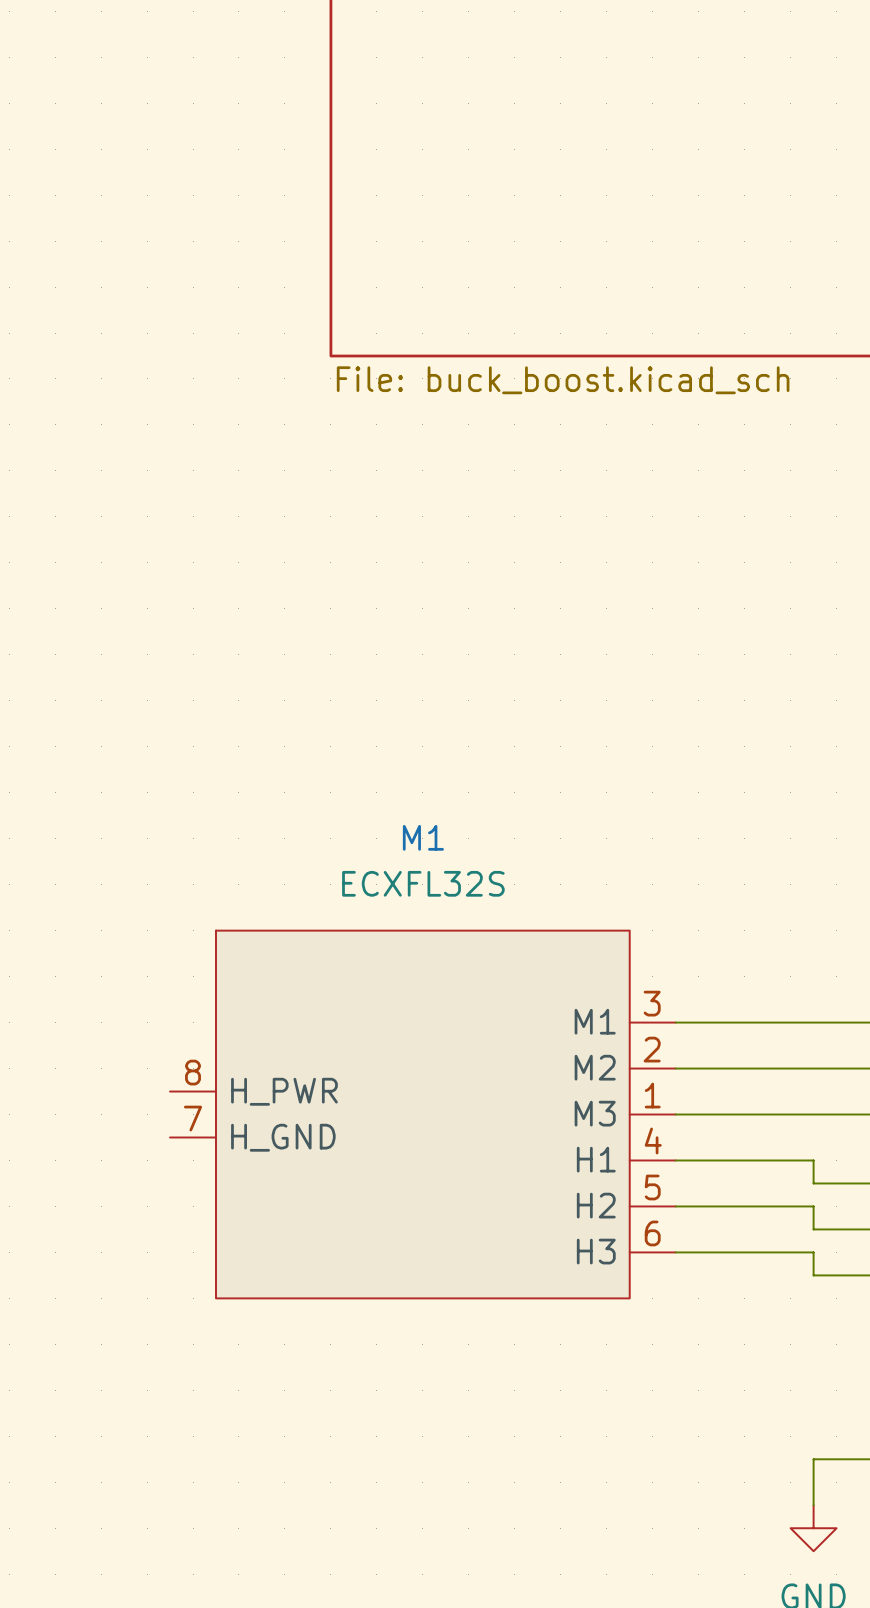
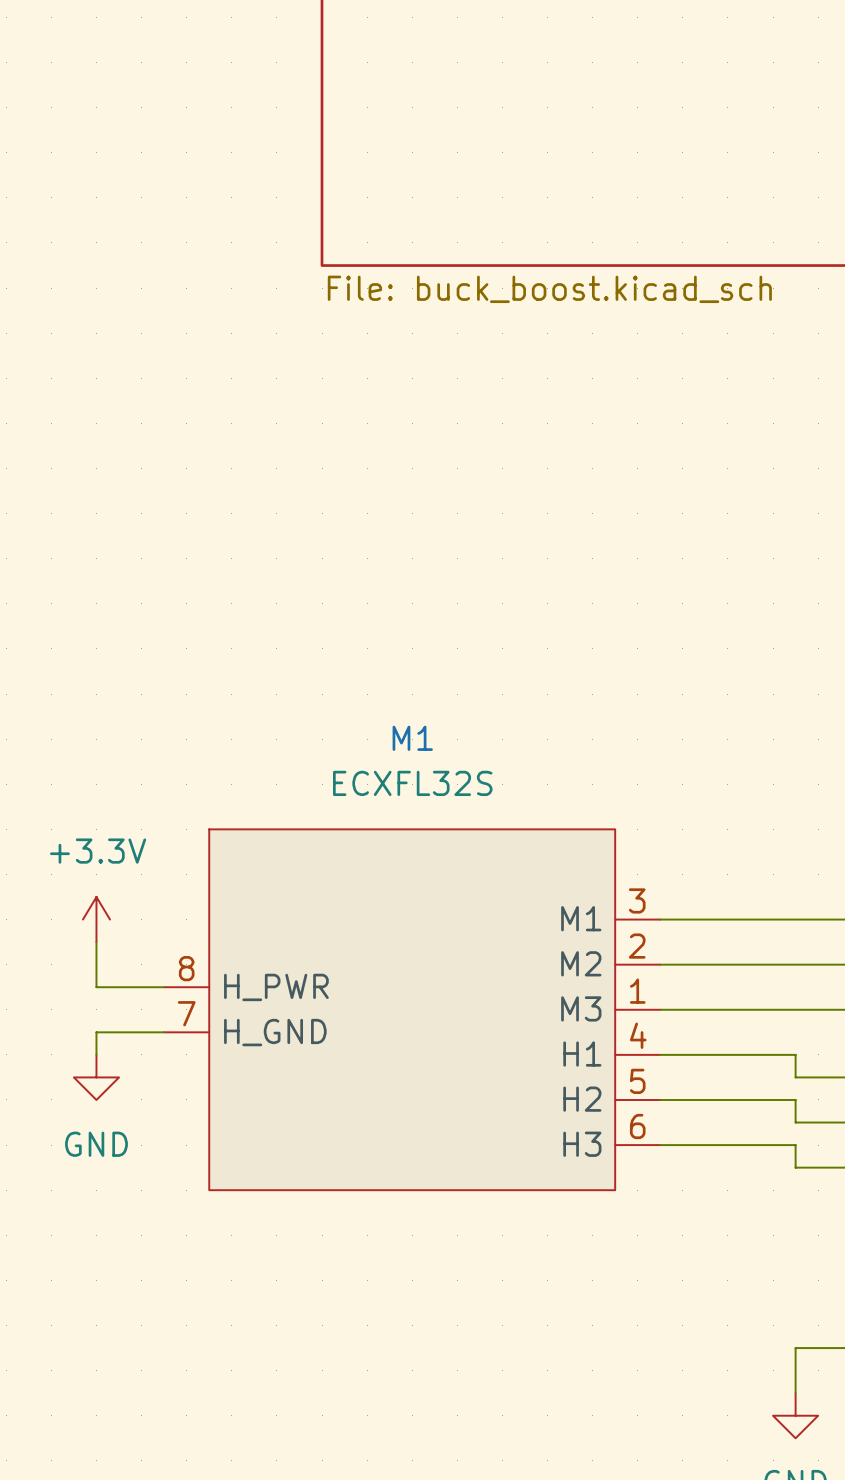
power symbol: none -> +3.3V (96, 919)
wire: none -> (96, 942) (96, 987) (164, 987)
wire: none -> (164, 1032) (96, 1032) (96, 1054)
power symbol: none -> GND (96, 1077)

